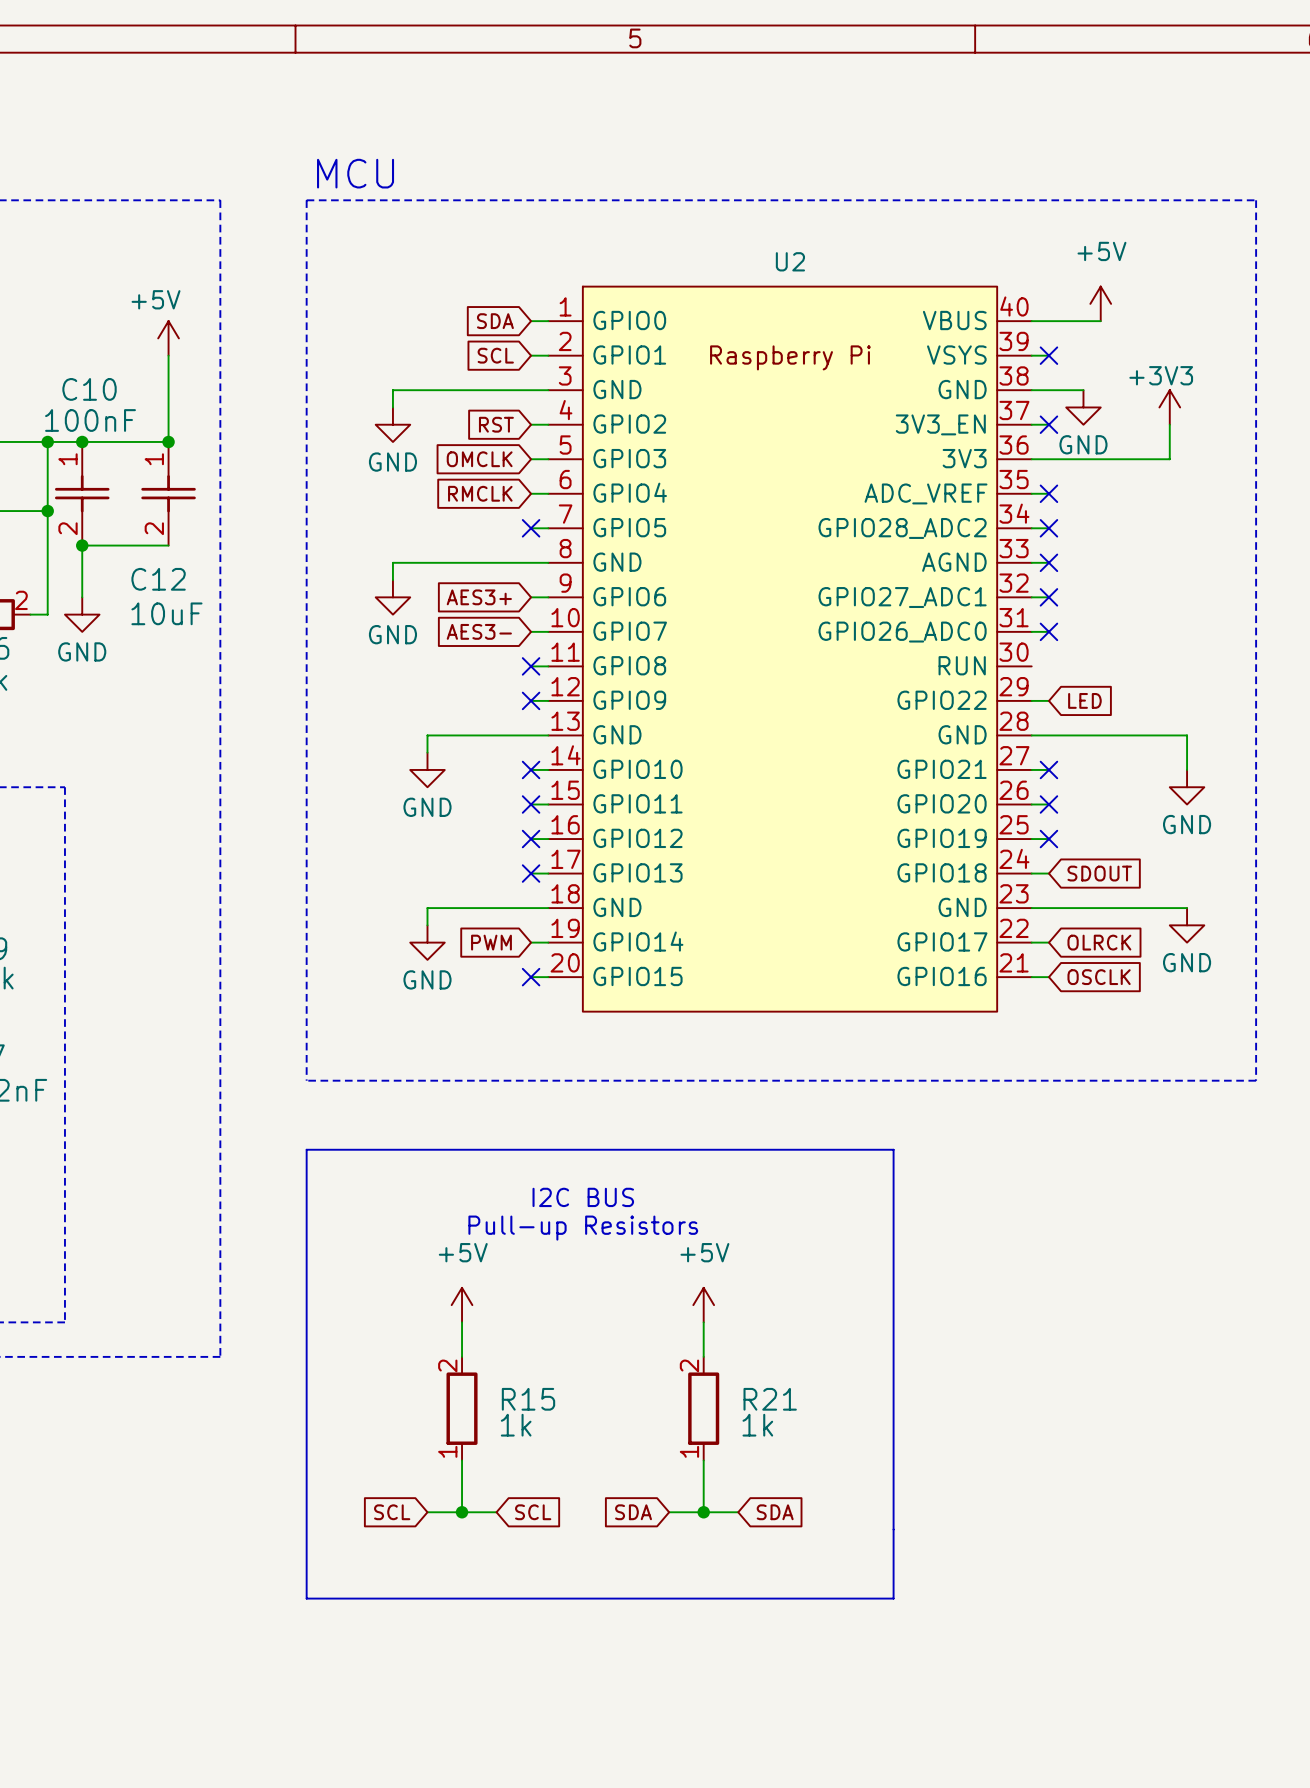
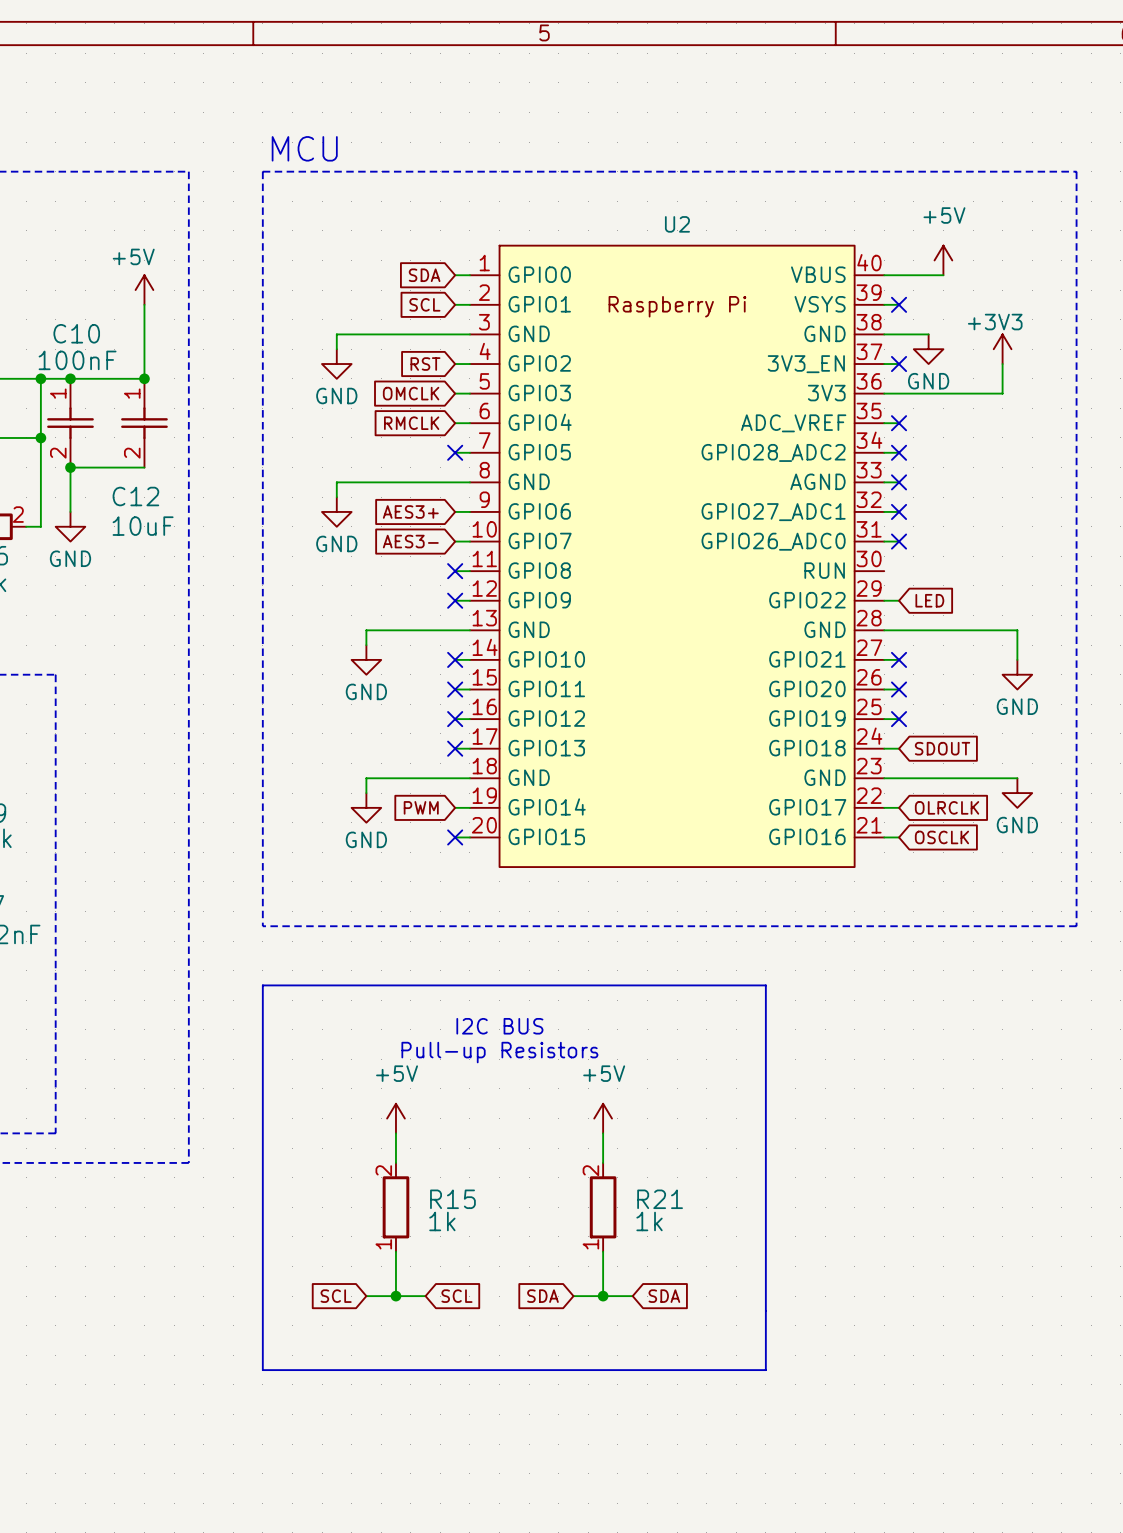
global label: OLRCK (1099, 942) -> OLRCLK (947, 807)

